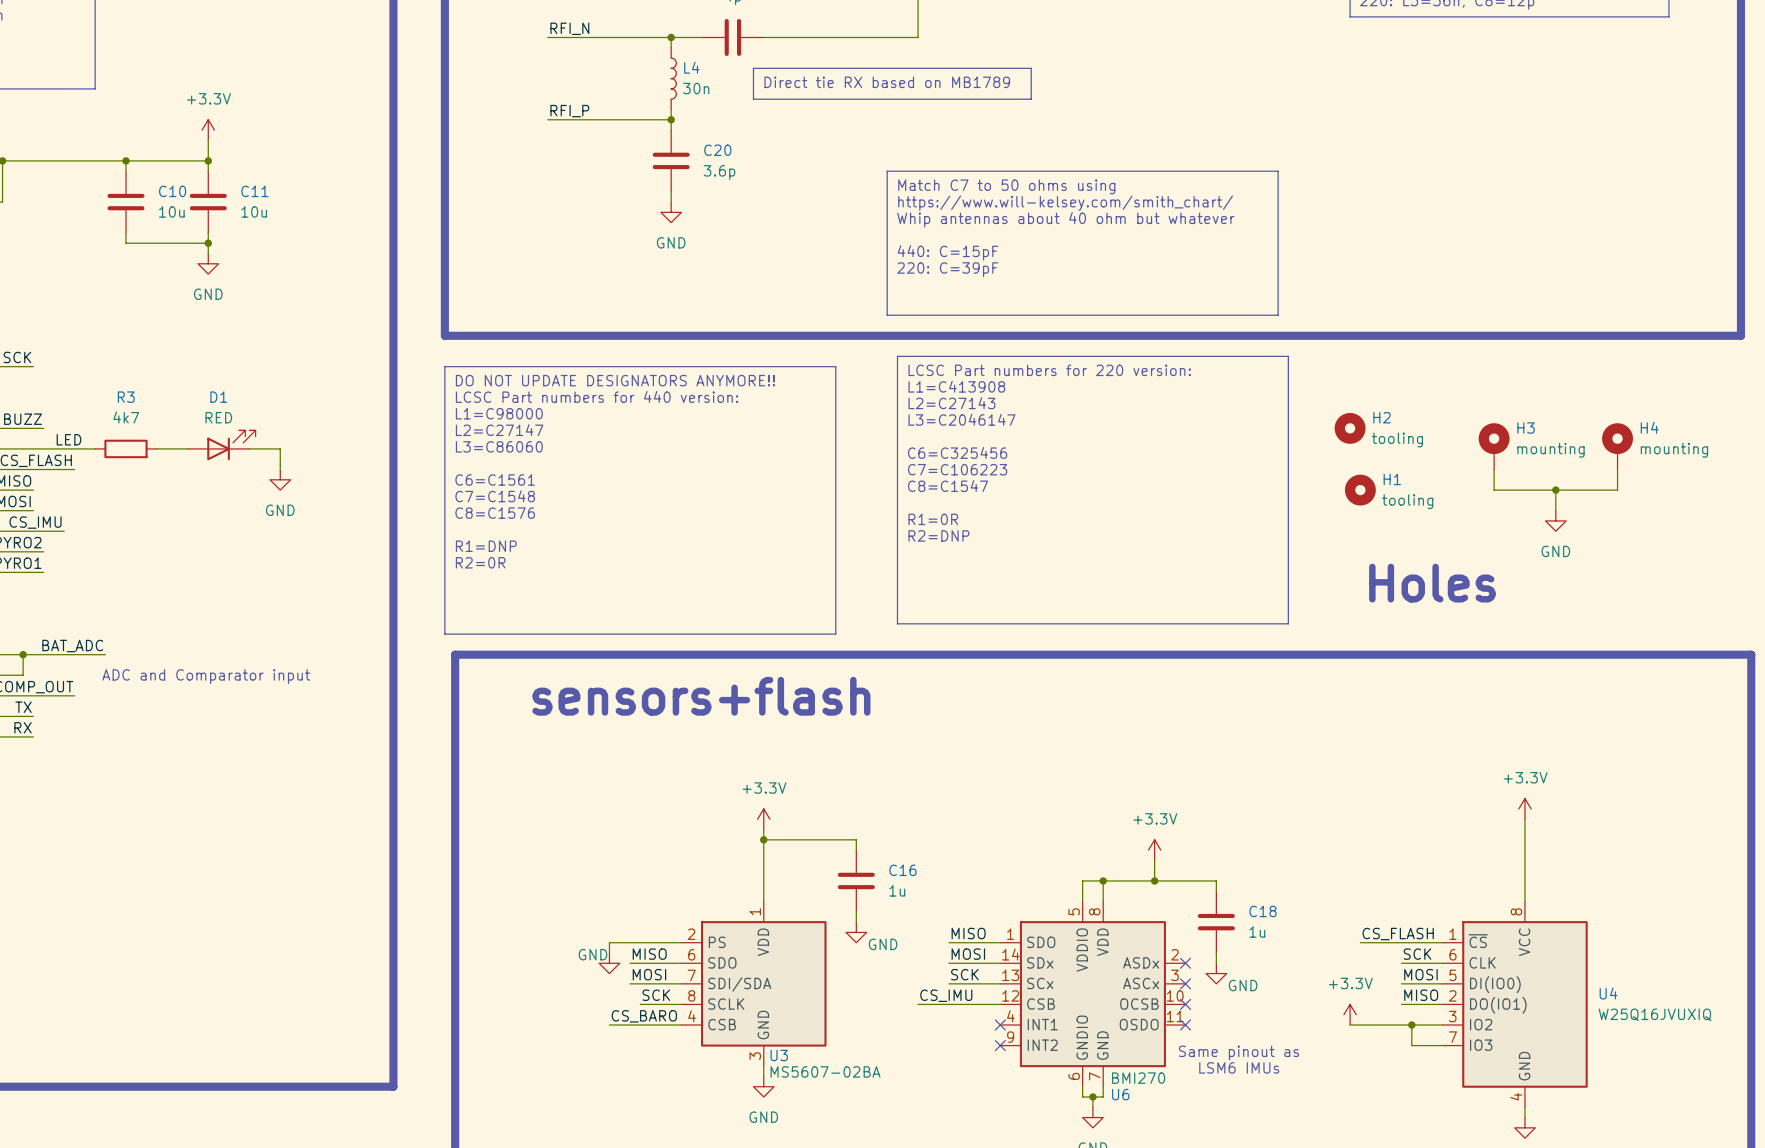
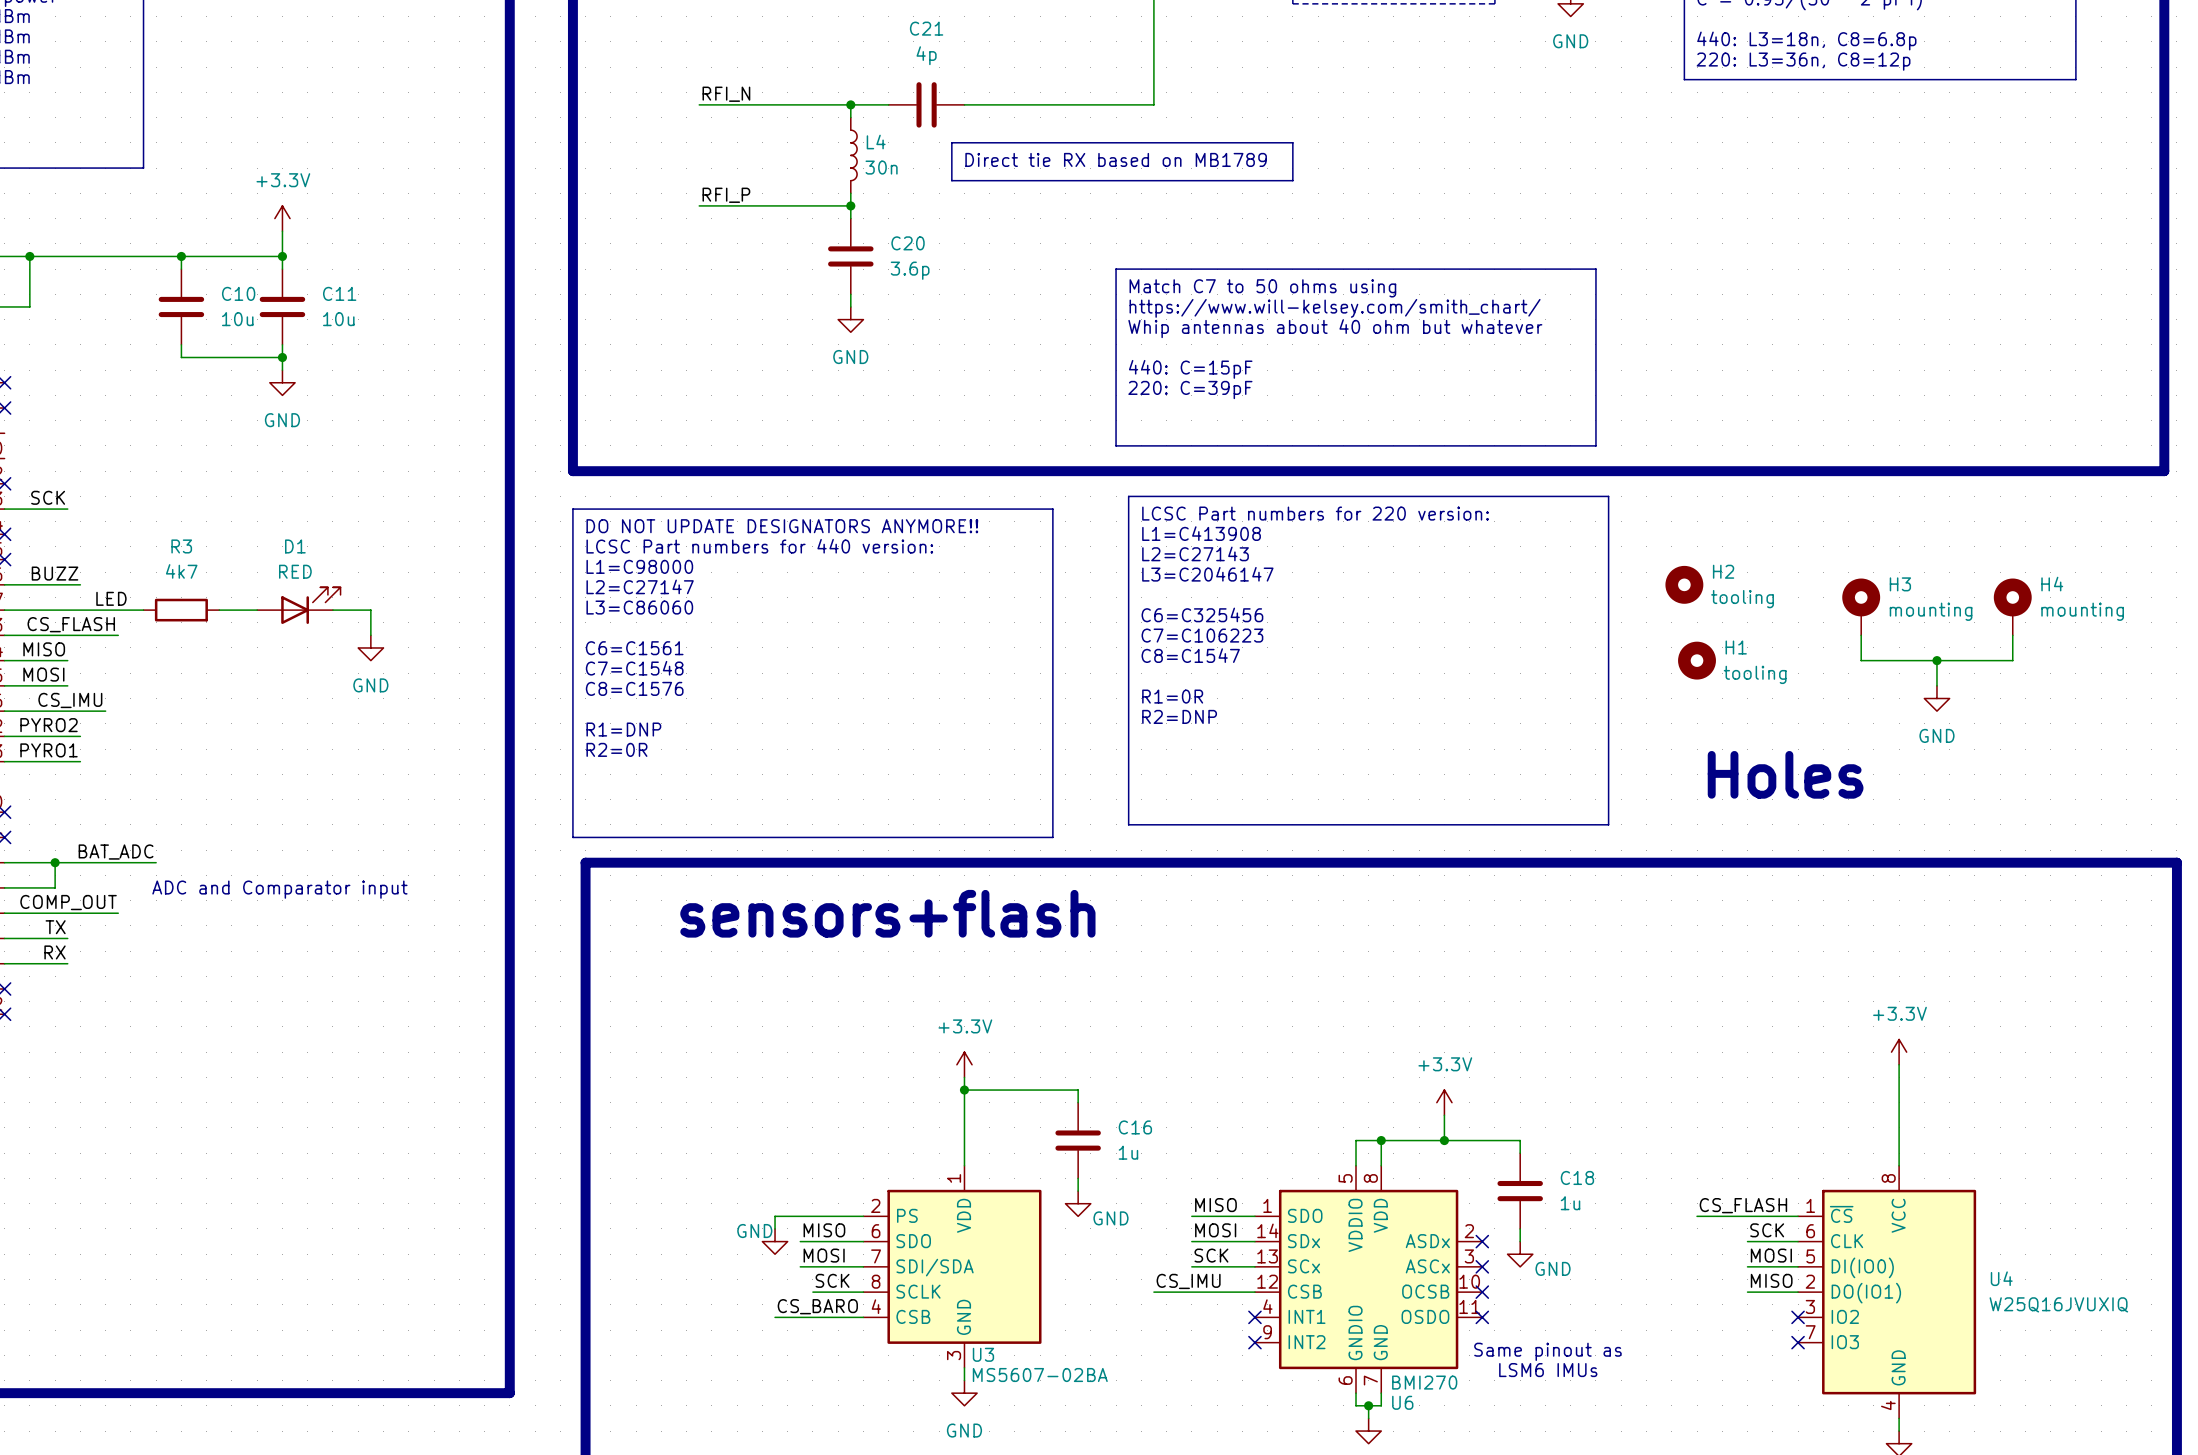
power symbol: +3.3V (1350, 1014) -> none
wire: (1350, 1025) (1442, 1025) -> none
wire: (1411, 1025) (1411, 1045) (1442, 1045) -> none
junction: (1411, 1025) -> none
no-connect mark: none -> (1798, 1317)
no-connect mark: none -> (1798, 1342)

